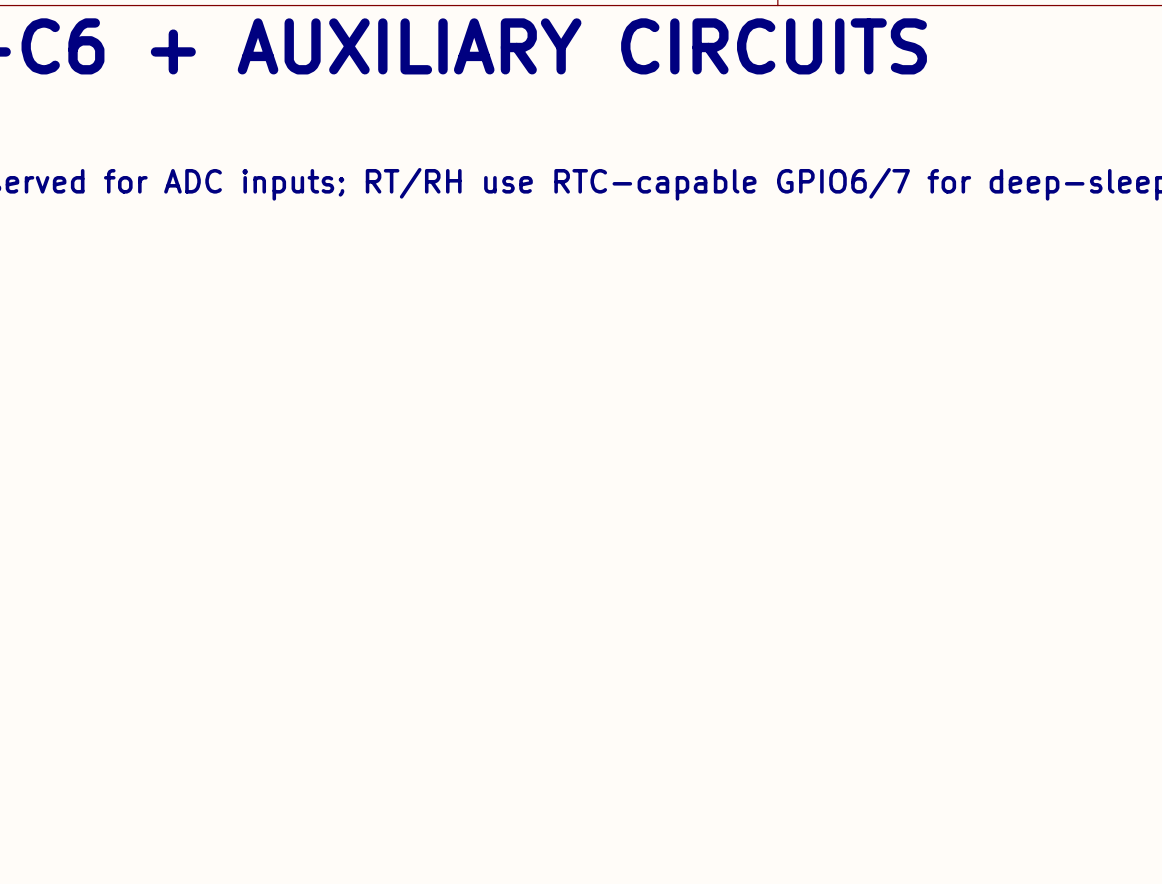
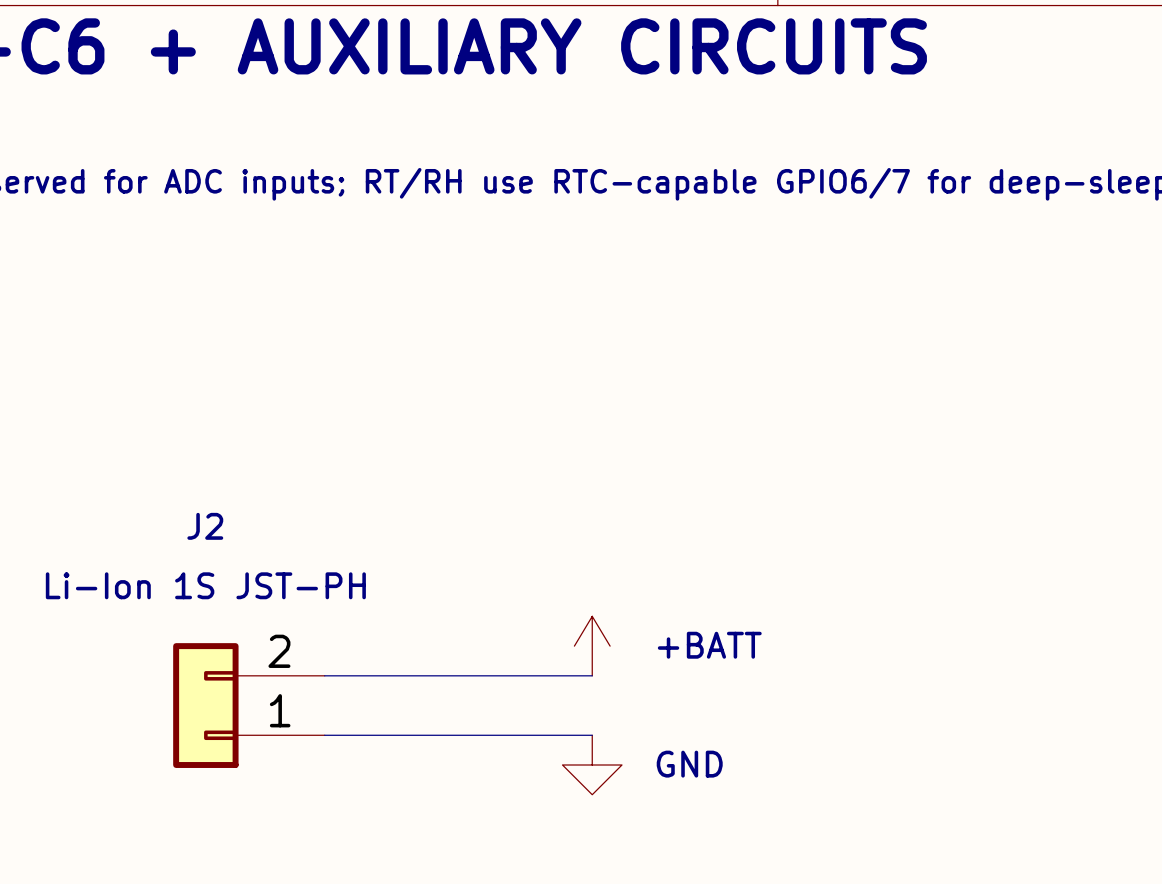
power symbol: none -> +BATT (592, 646)
wire: none -> (324, 675) (592, 675)
J2: none -> Li-Ion 1S JST-PH (248, 705)
wire: none -> (324, 735) (592, 735)
power symbol: none -> GND (592, 765)

